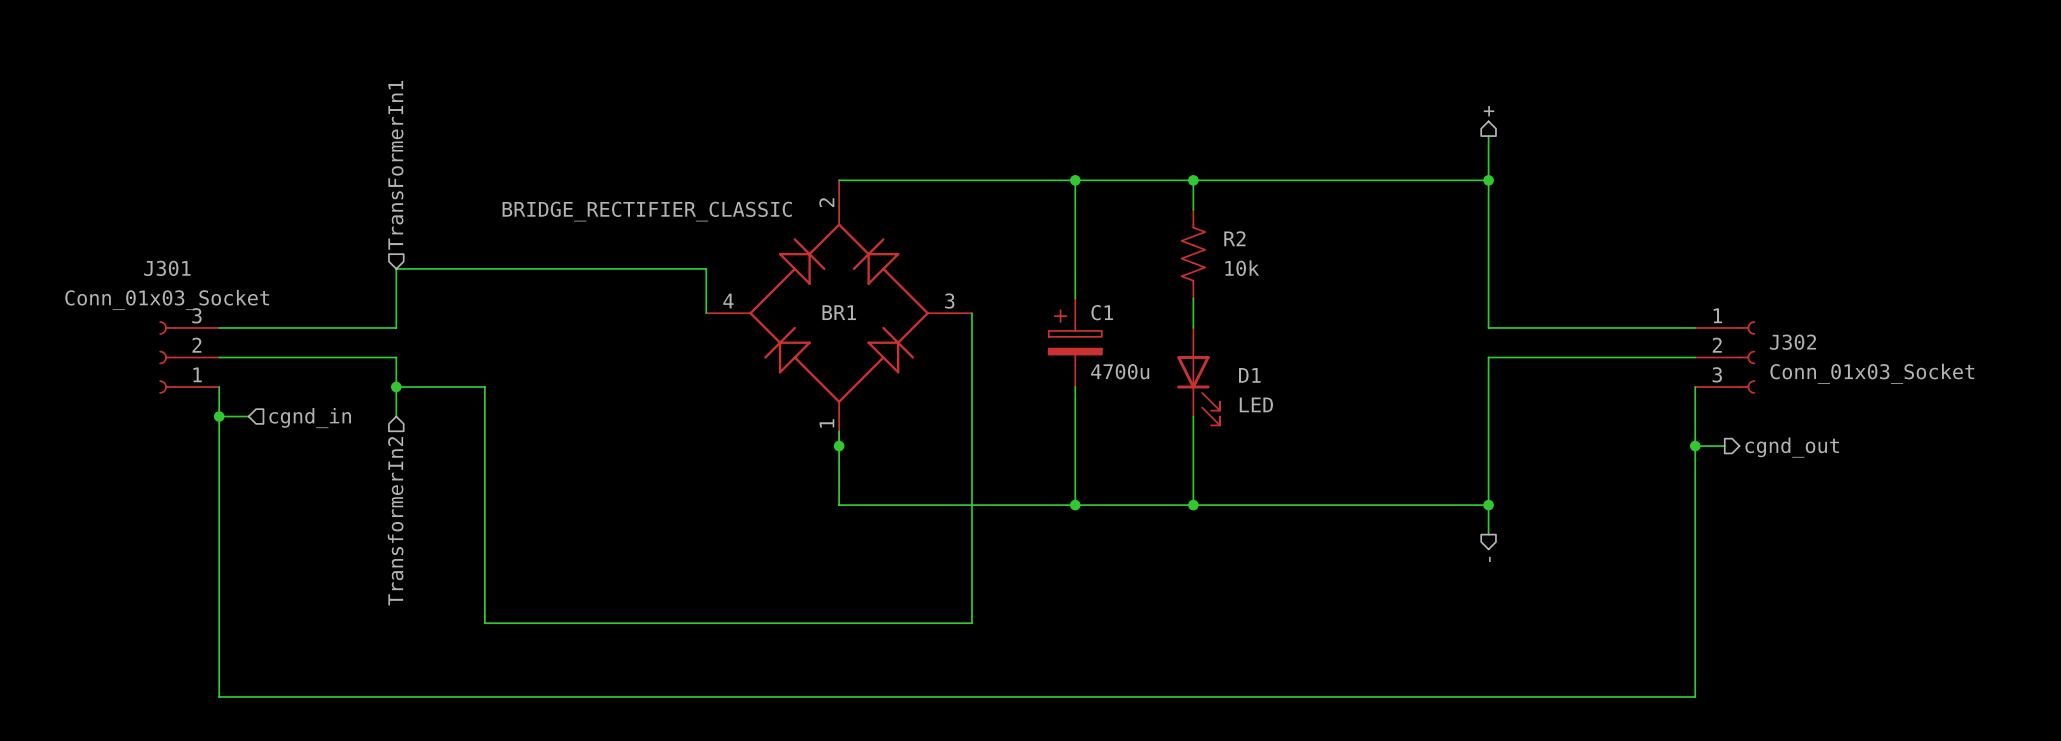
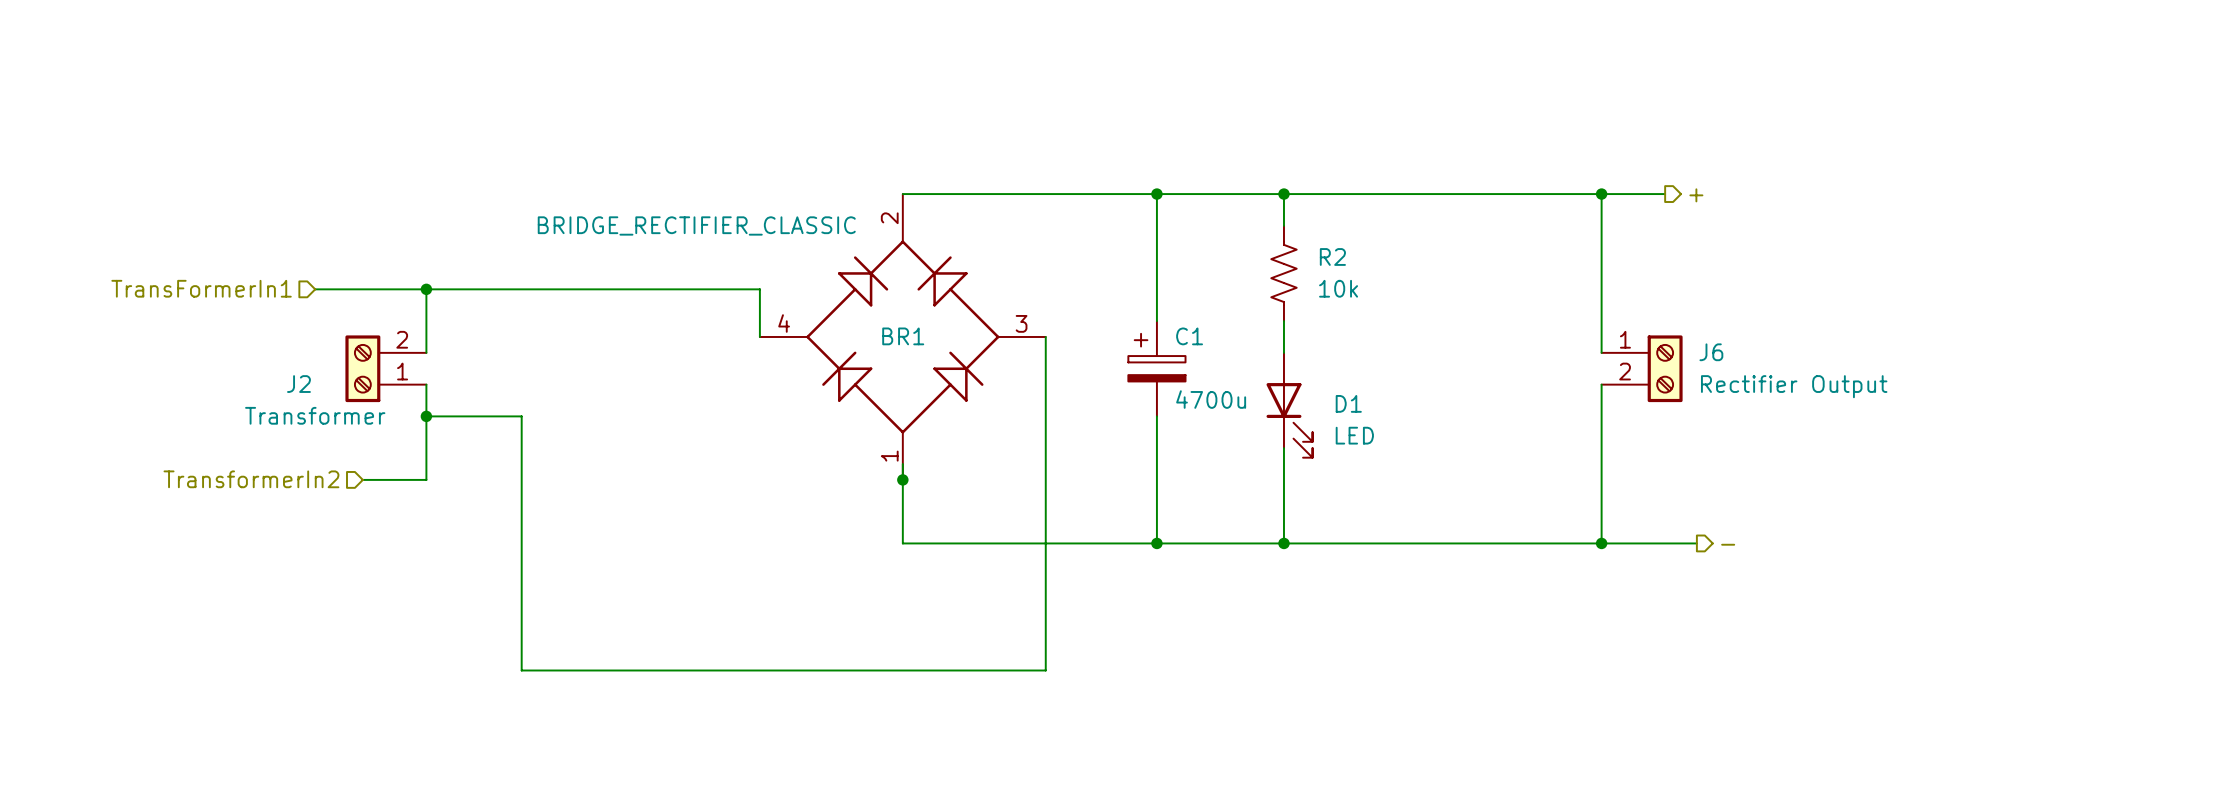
hierarchical label rotation: 0° (1489, 111) -> 90° clockwise (1696, 195)
hierarchical label position: + (1489, 111) -> + (1696, 195)
wire: (1488, 136) (1488, 180) -> (1665, 194) (1601, 194)
hierarchical label rotation: 0° (395, 165) -> 90° counterclockwise (201, 288)
hierarchical label position: TransFormerIn1 (395, 165) -> TransFormerIn1 (201, 288)
wire: none -> (315, 289) (426, 289)
junction: none -> (426, 289)
wire: (219, 327) (396, 327) -> none
wire: (1488, 327) (1695, 327) -> none
J2: none -> Transformer (385, 368)
J6: none -> Rectifier Output (1642, 368)
J301: Conn_01x03_Socket (189, 357) -> none
wire: (219, 357) (396, 357) -> none
wire: (1488, 357) (1695, 357) -> none
J302: Conn_01x03_Socket (1725, 357) -> none
wire: (219, 387) (219, 696) (1695, 696) (1695, 387) -> none
wire: (219, 416) (248, 416) -> none
junction: (219, 416) -> none
wire: none -> (426, 448) (426, 479) (362, 479)
hierarchical label: cgnd_in (310, 418) -> none
wire: (1695, 446) (1724, 446) -> none
junction: (1695, 446) -> none
hierarchical label: cgnd_out (1792, 447) -> none
wire: (1488, 505) (1488, 534) -> (1601, 543) (1696, 543)
hierarchical label rotation: 0° (395, 521) -> 90° clockwise (251, 479)
hierarchical label rotation: 0° (1489, 559) -> 90° counterclockwise (1728, 544)
hierarchical label position: - (1489, 559) -> - (1728, 544)

